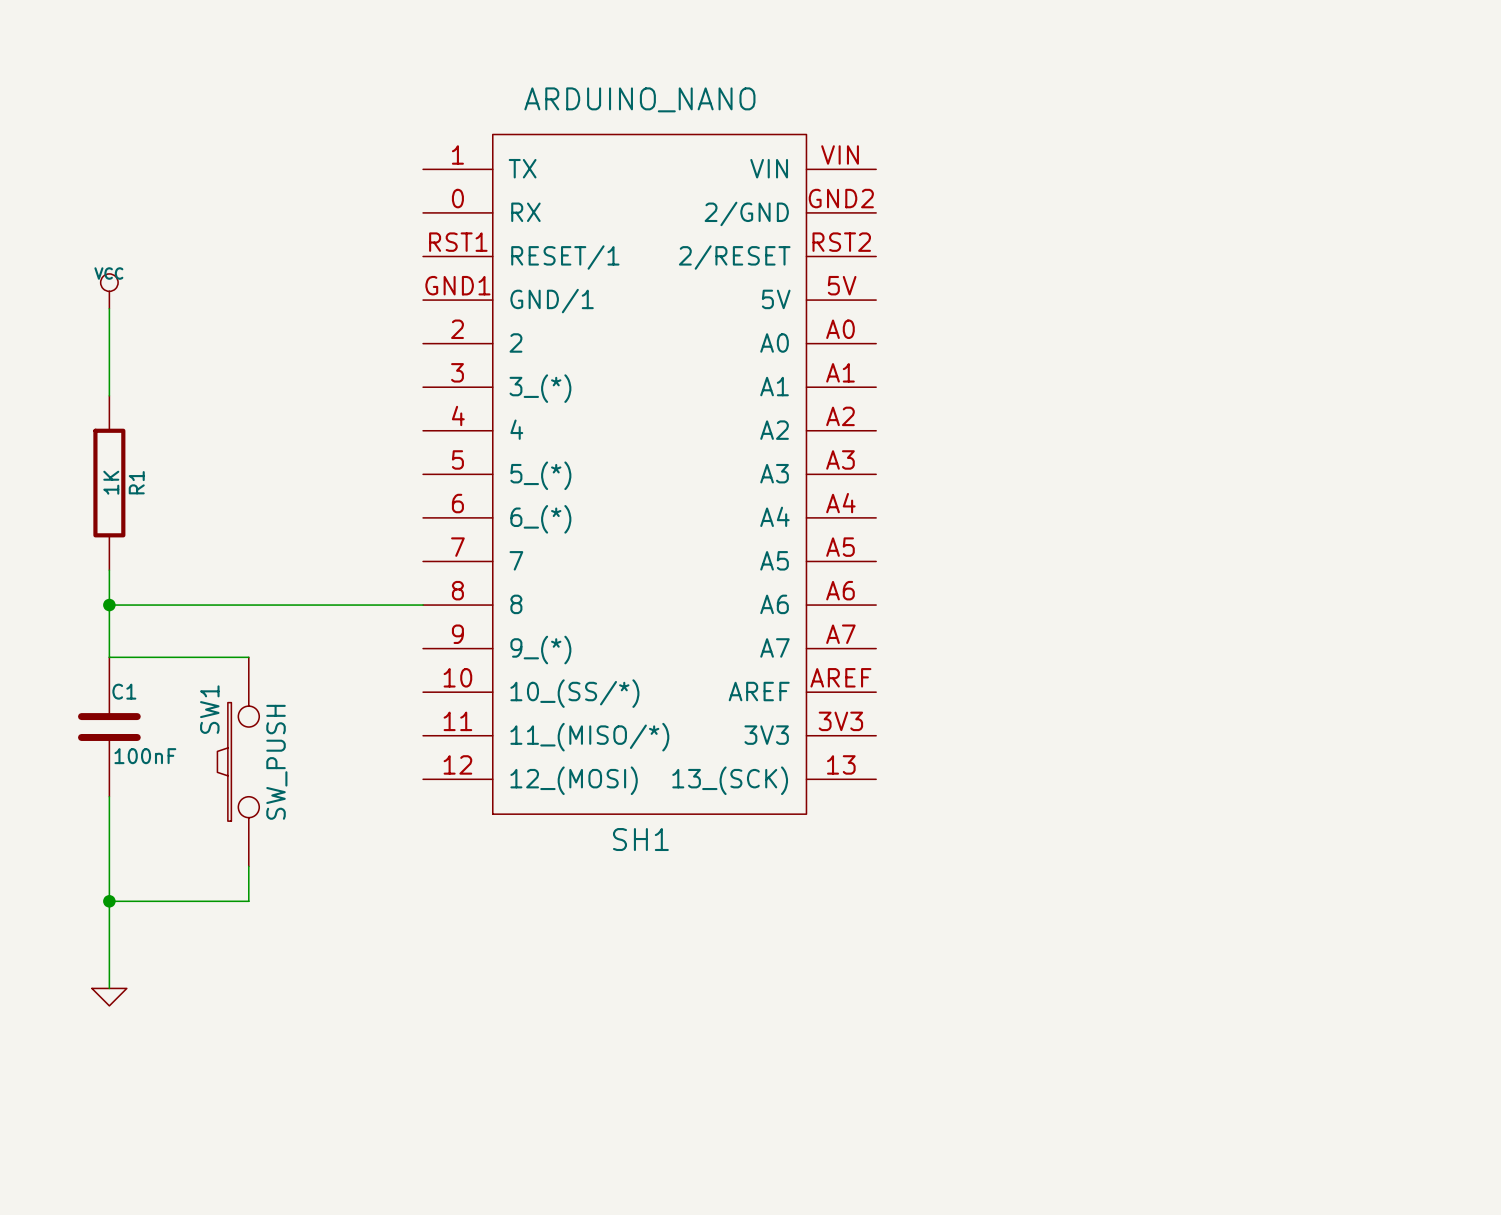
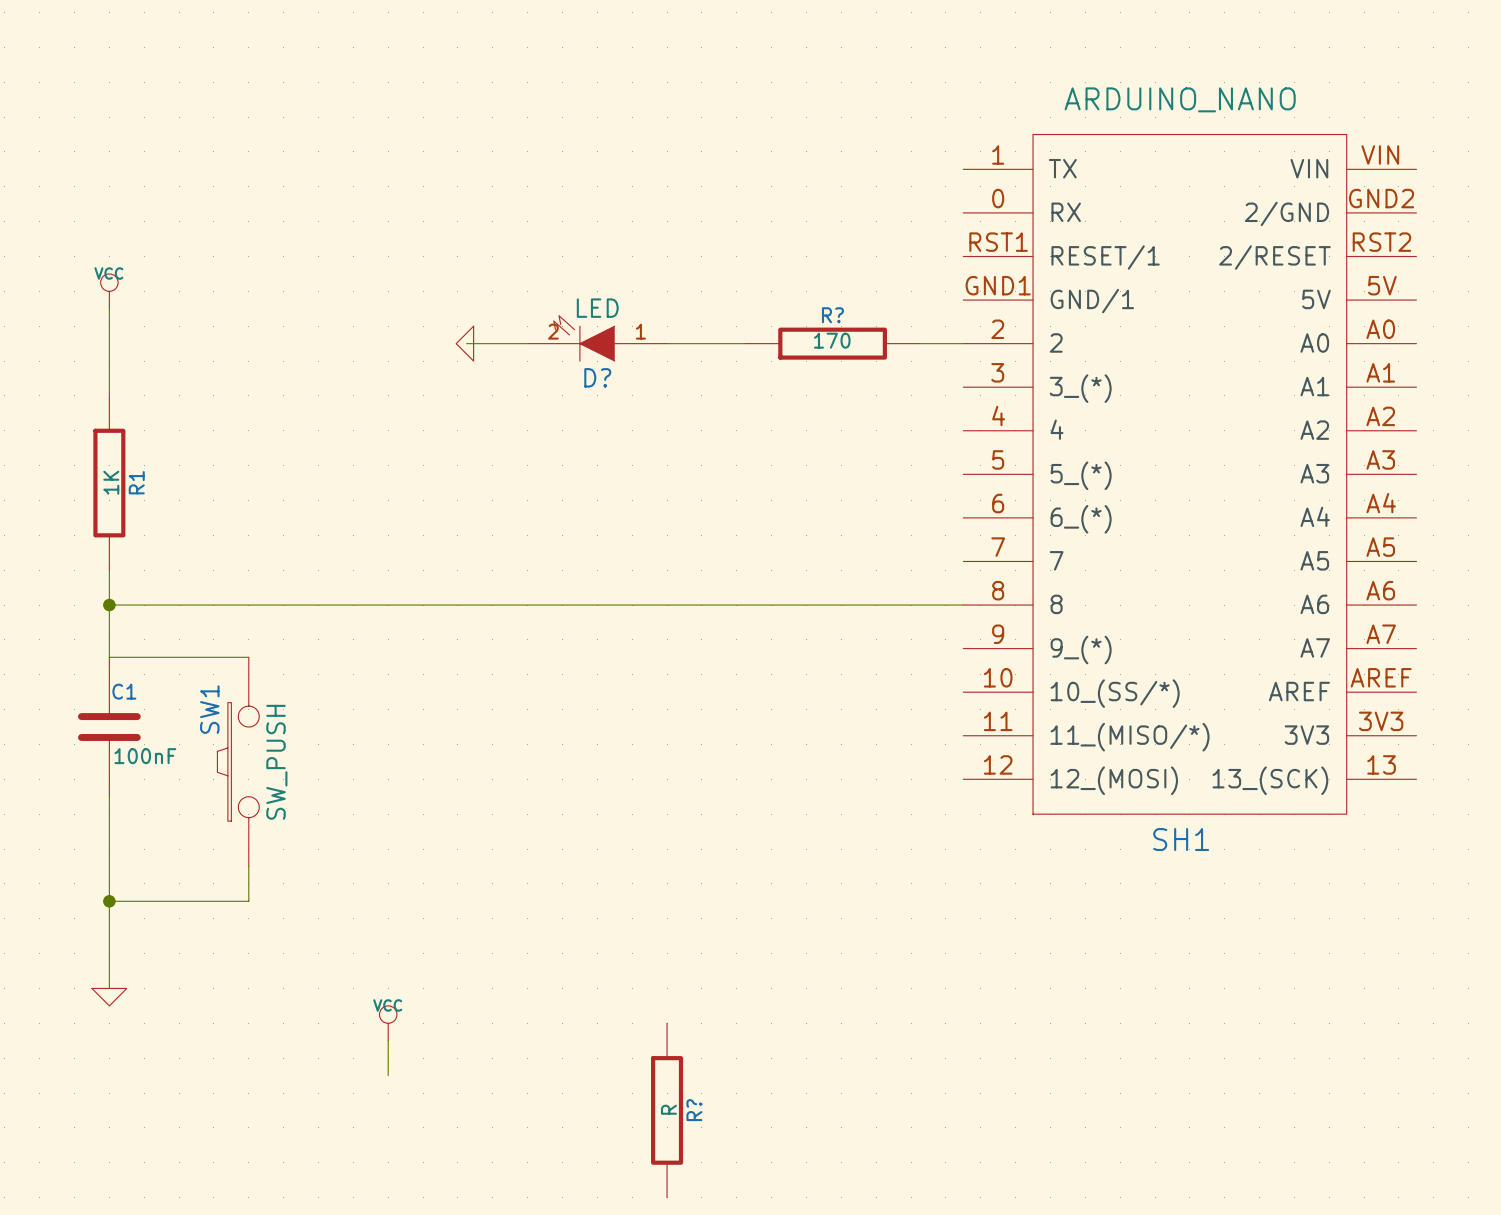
D?: none -> LED (597, 338)
power symbol: none -> (464, 343)
wire: none -> (466, 343) (527, 343)
wire: none -> (667, 343) (745, 343)
R?: none -> 170 (832, 343)
wire: none -> (919, 343) (963, 343)
SH1 position: (649, 474) -> (1189, 474)
wire: none -> (423, 605) (963, 605)
power symbol: none -> VCC (388, 1023)
wire: none -> (388, 1040) (388, 1075)
R?: none -> R (667, 1110)

